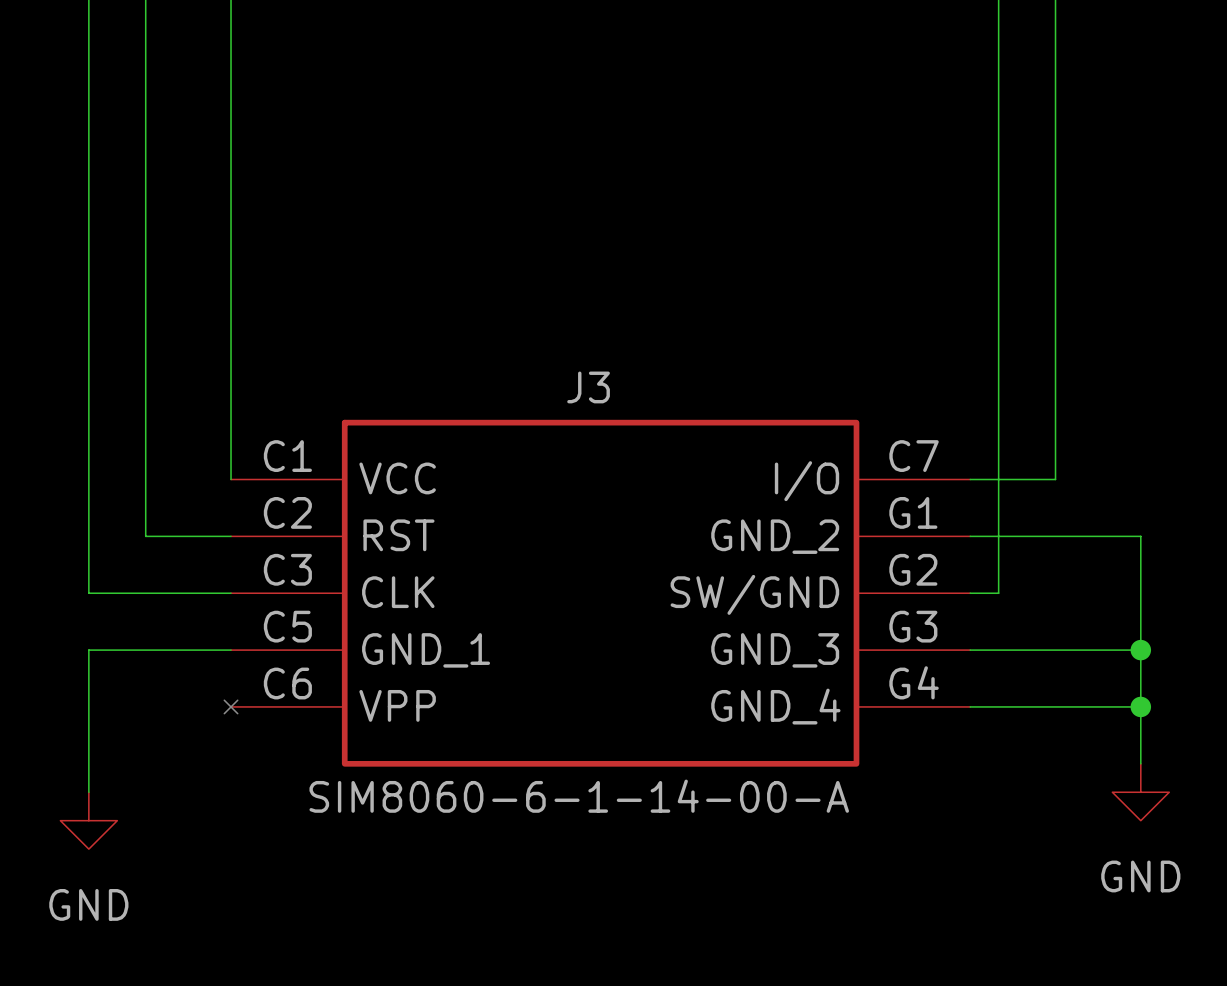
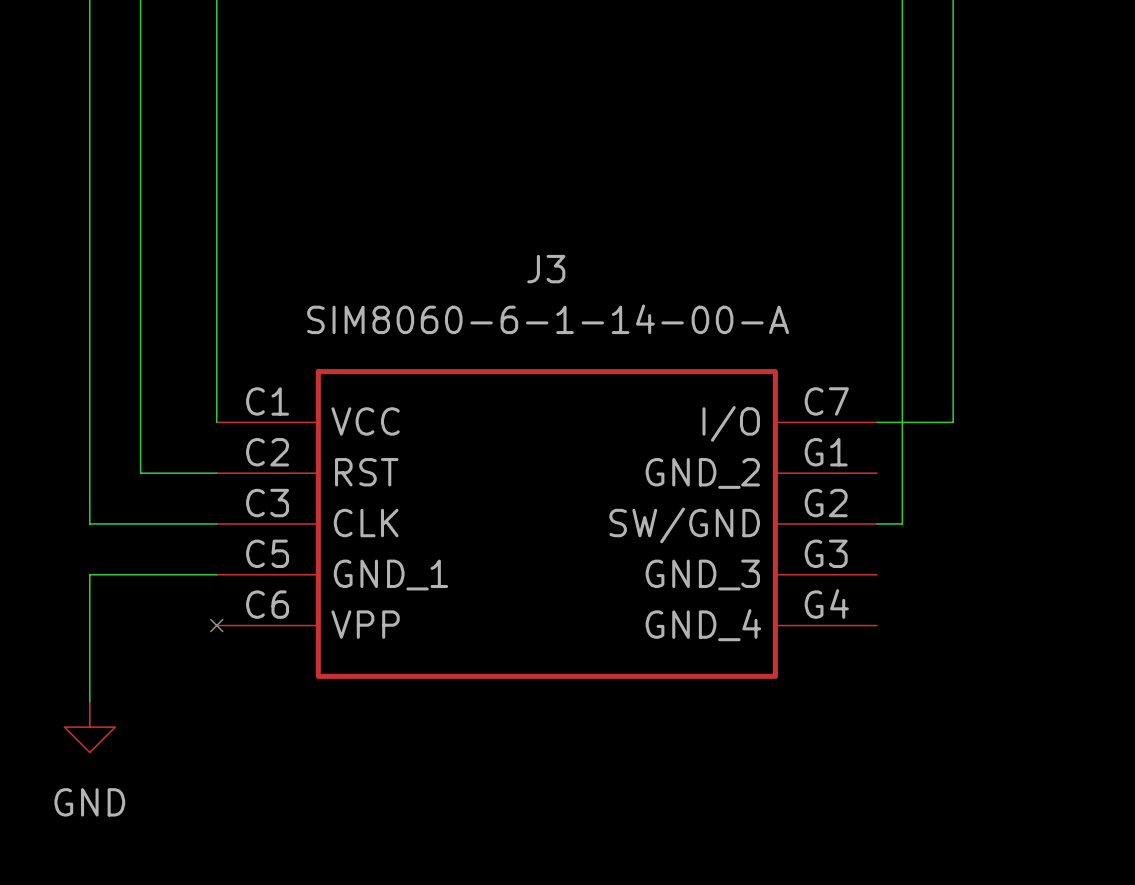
J3 name position: J3 (588, 387) -> J3 (546, 269)
wire: (970, 536) (1140, 536) (1140, 763) -> none
wire: (970, 650) (1140, 650) -> none
junction: (1140, 650) -> none
wire: (970, 706) (1140, 706) -> none
junction: (1140, 706) -> none
power symbol: GND (1140, 792) -> none
J3 value position: SIM8060-6-1-14-00-A (579, 796) -> SIM8060-6-1-14-00-A (548, 319)

